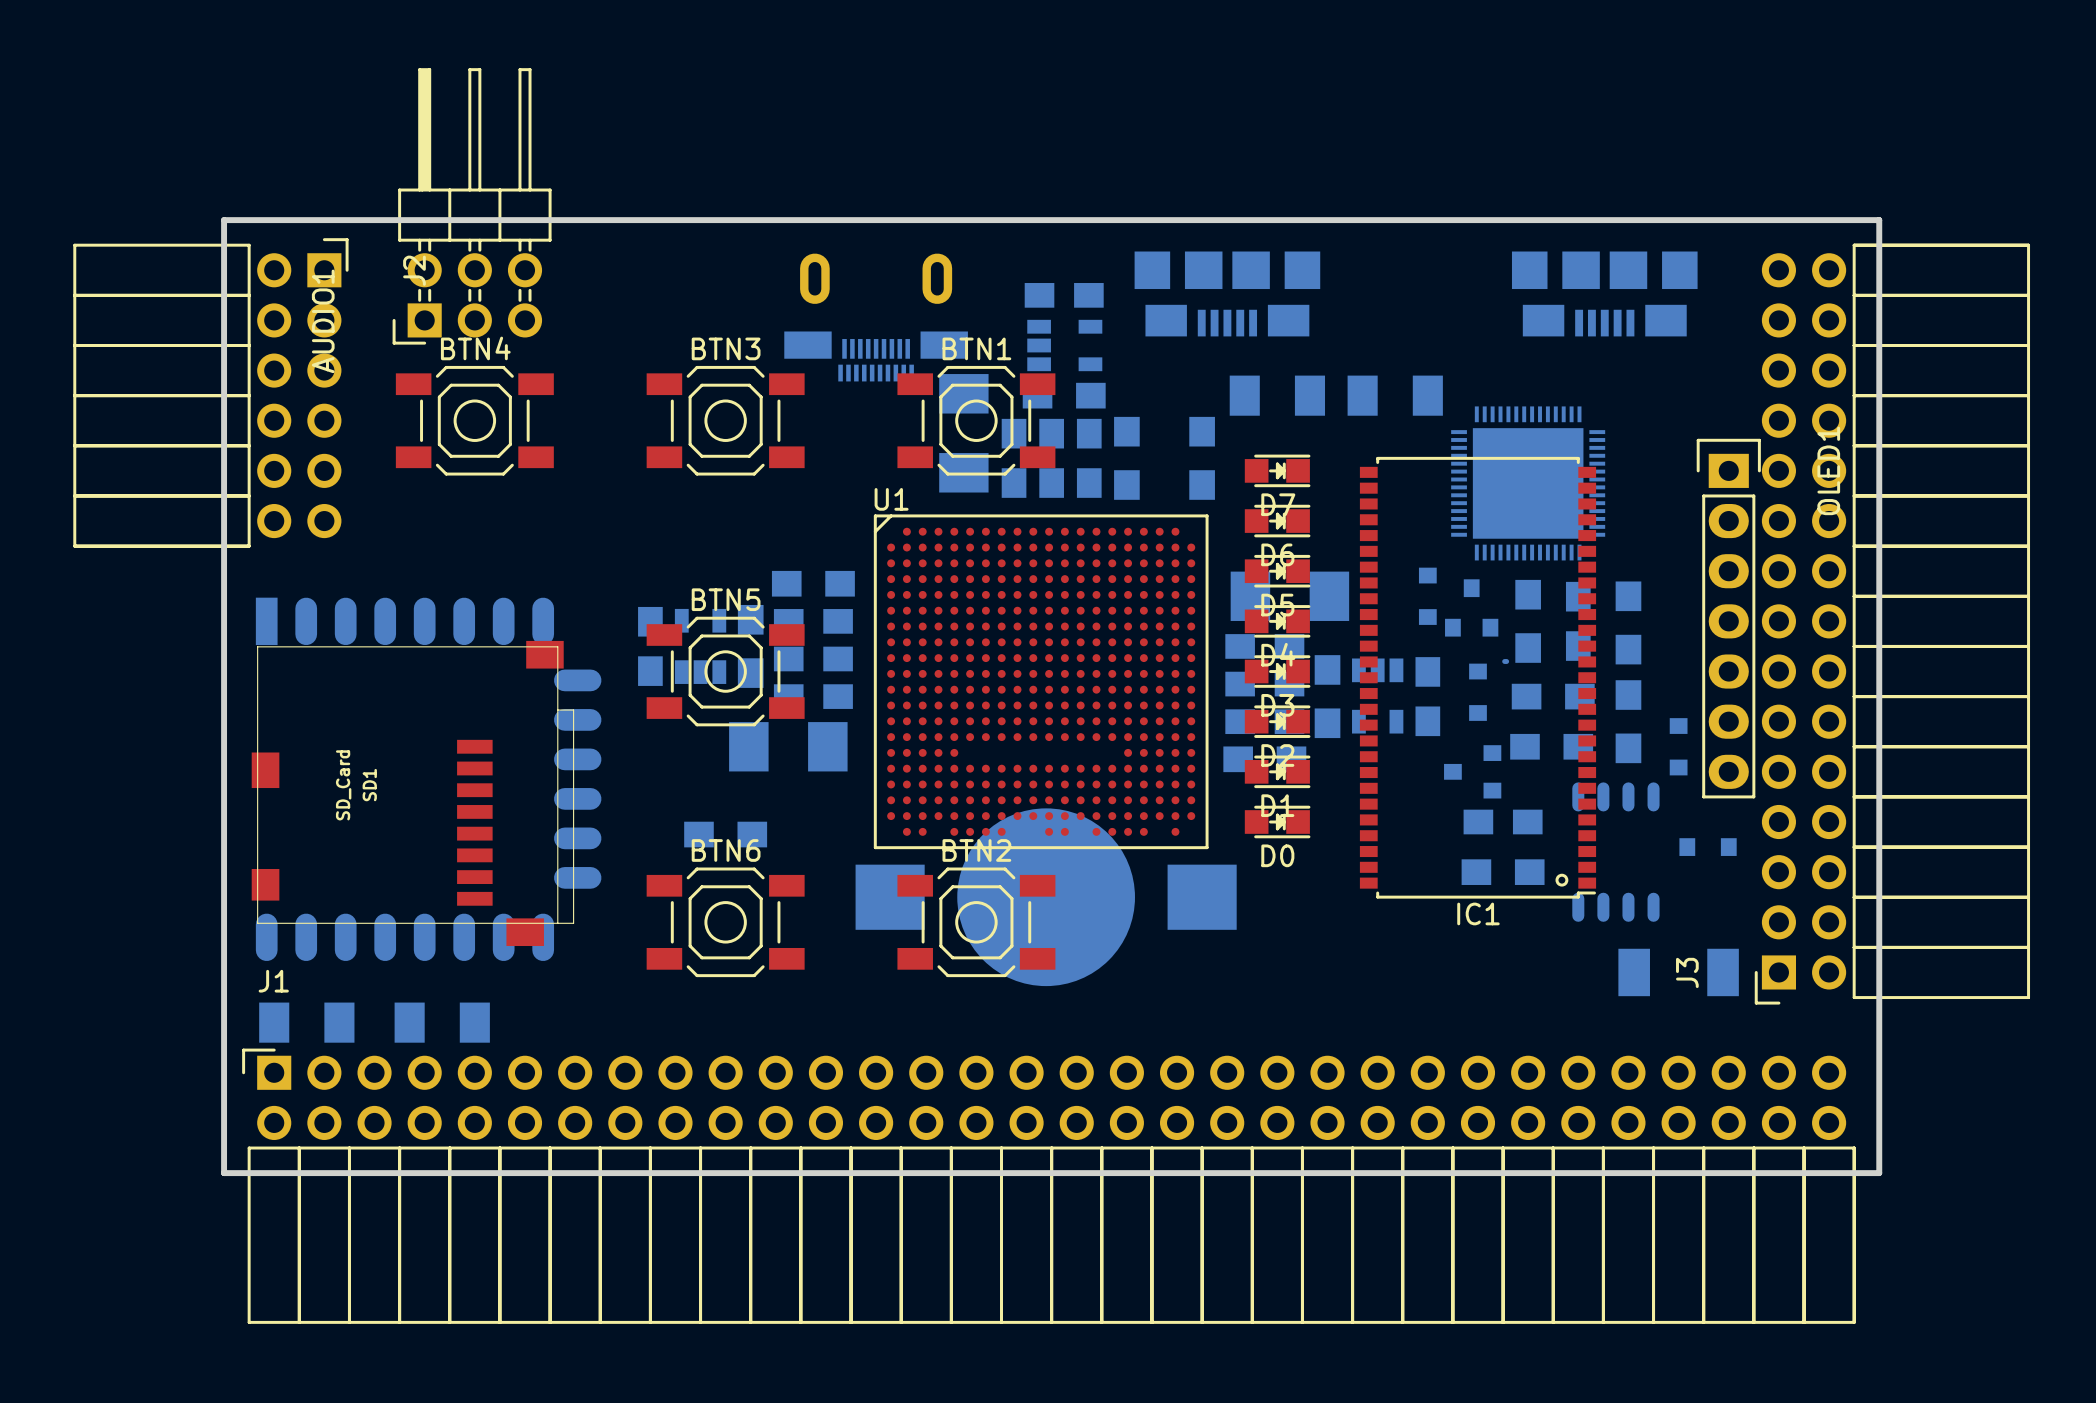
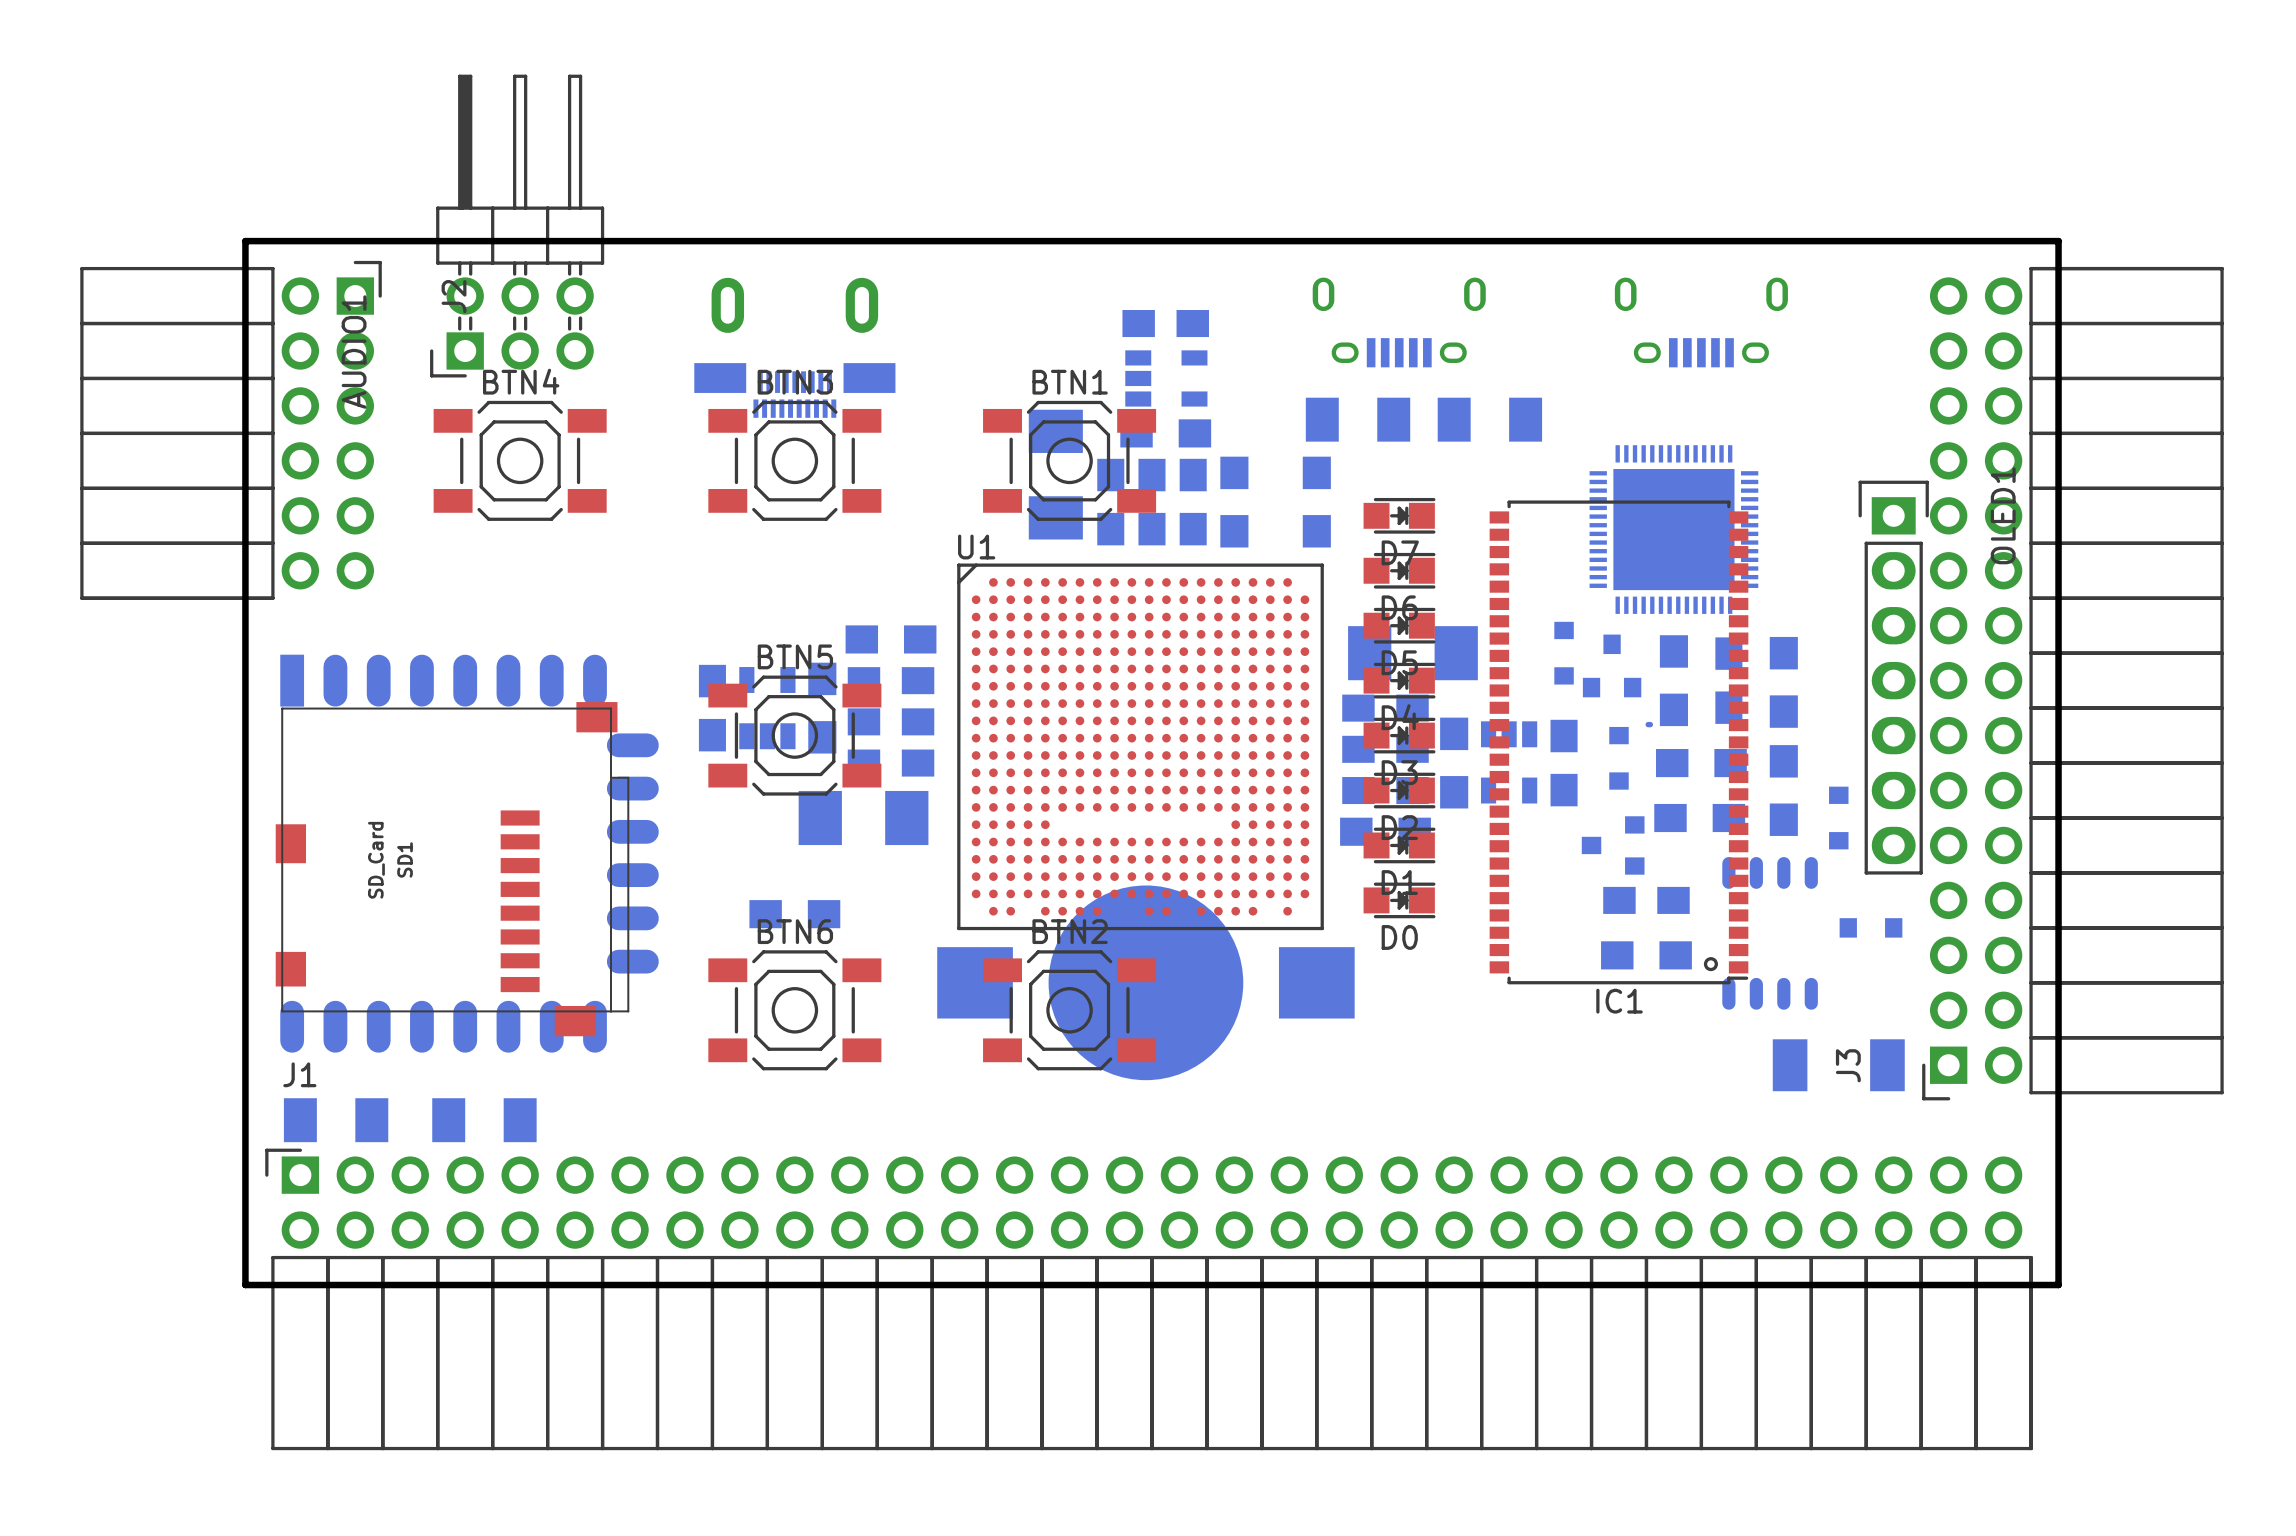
part: (1227, 293) -> none
part: (1604, 293) -> none
part: none -> (1399, 322)
part: none -> (1701, 322)
part position: (876, 317) -> (794, 347)
part position: (1277, 395) -> (1358, 419)
part position: (1395, 395) -> (1489, 419)

